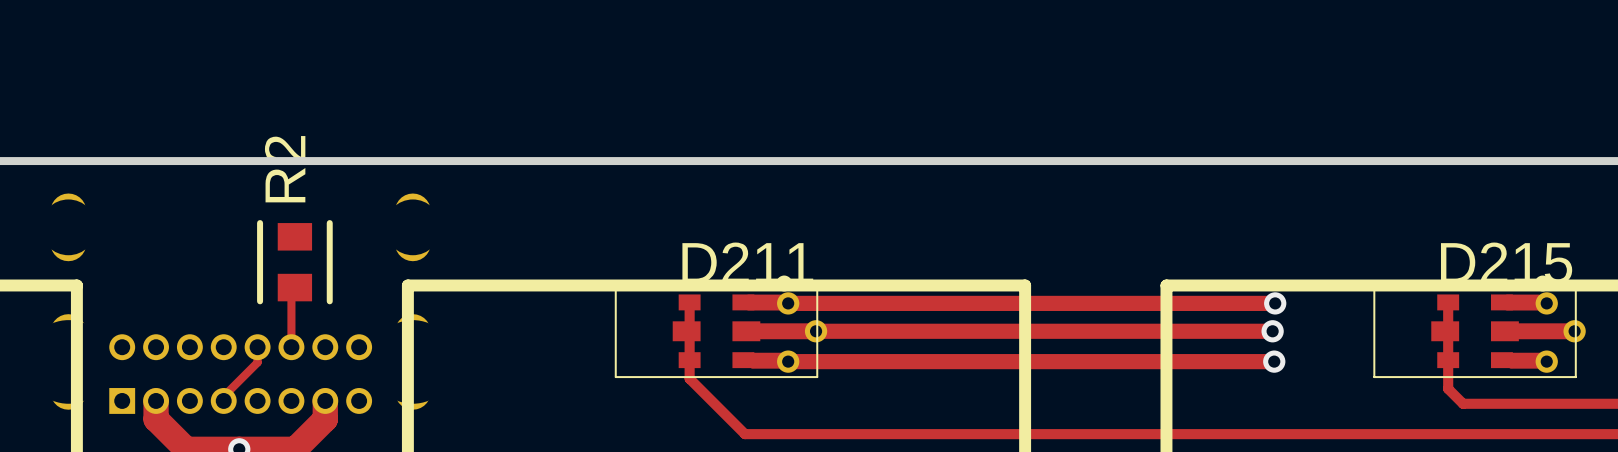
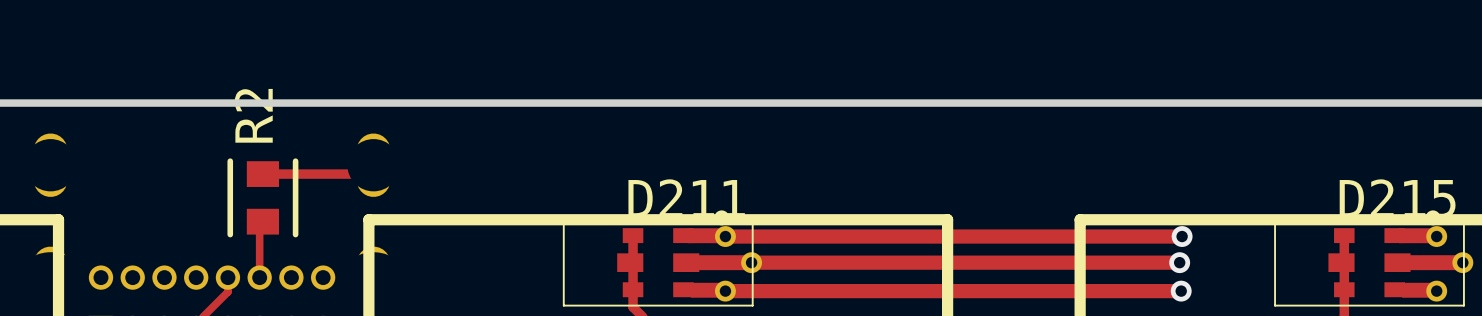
track: none -> (373, 165) (364, 174) (262, 174)

